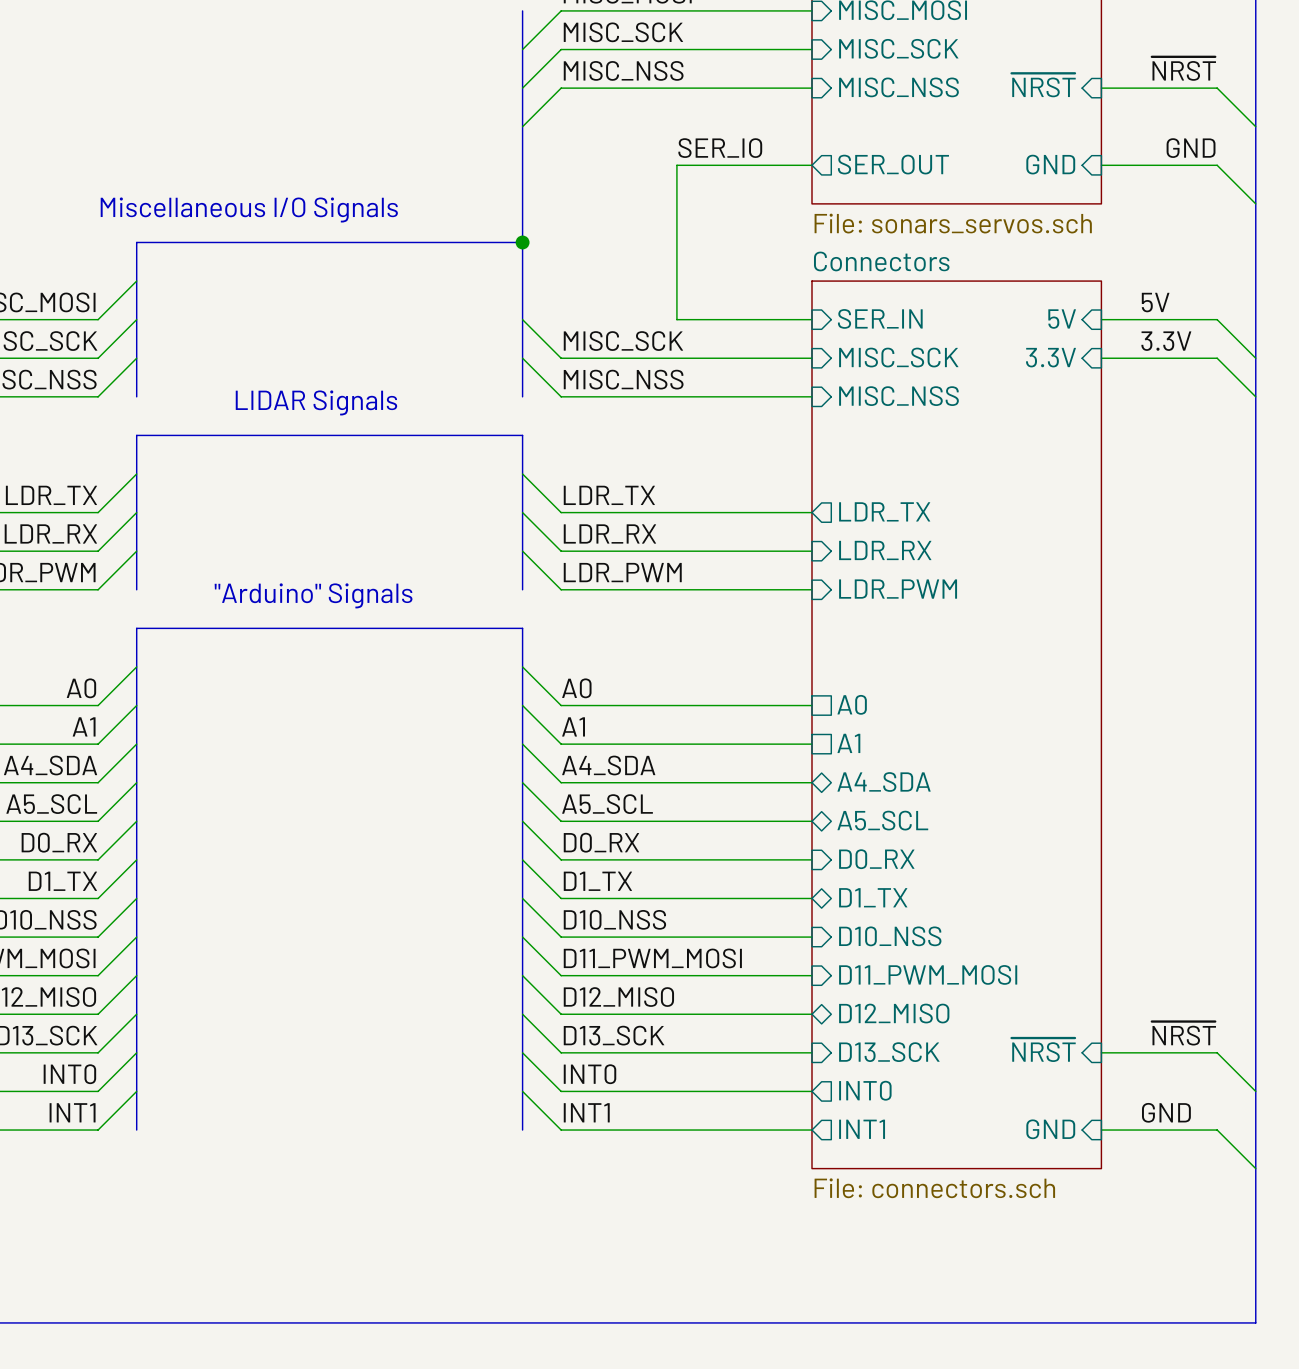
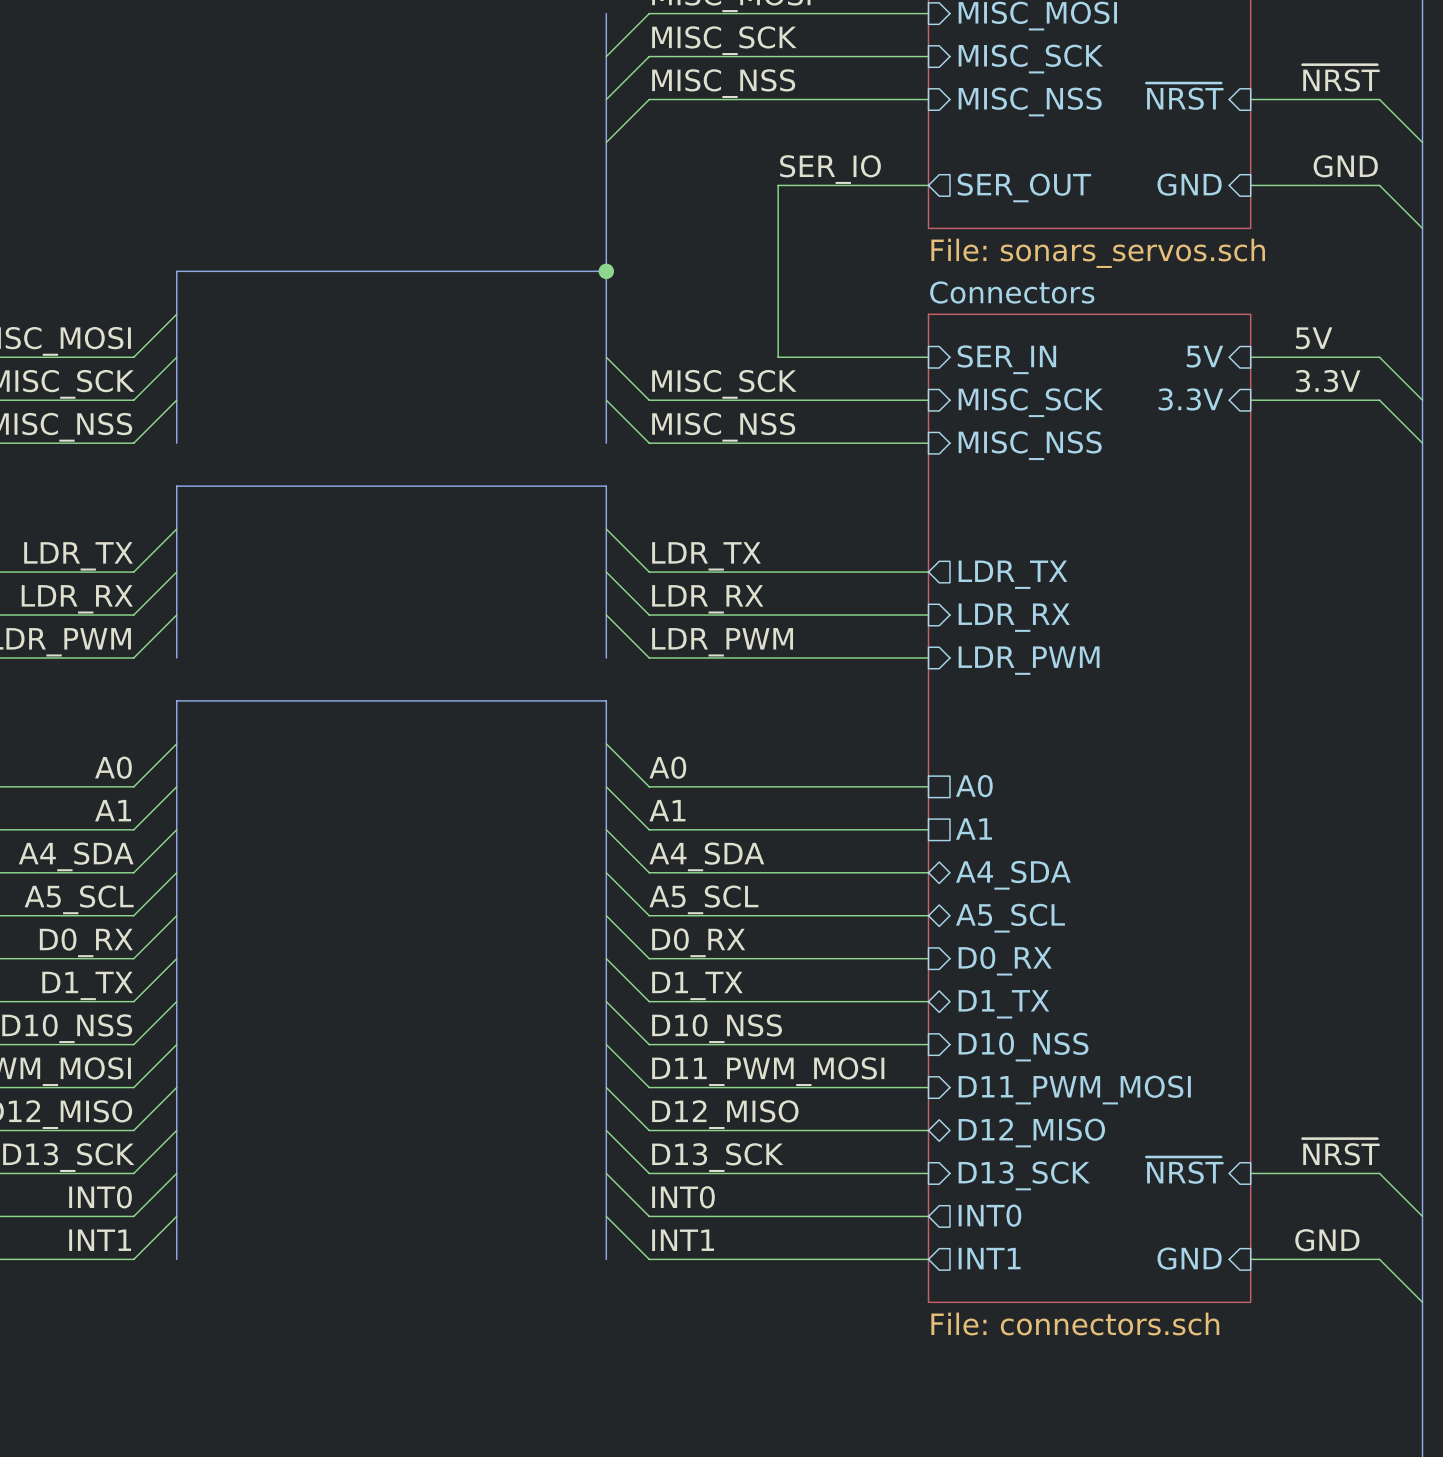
text: Miscellaneous I/O Signals (249, 209) -> none
text: LIDAR Signals (316, 402) -> none
text: "Arduino" Signals (313, 595) -> none

